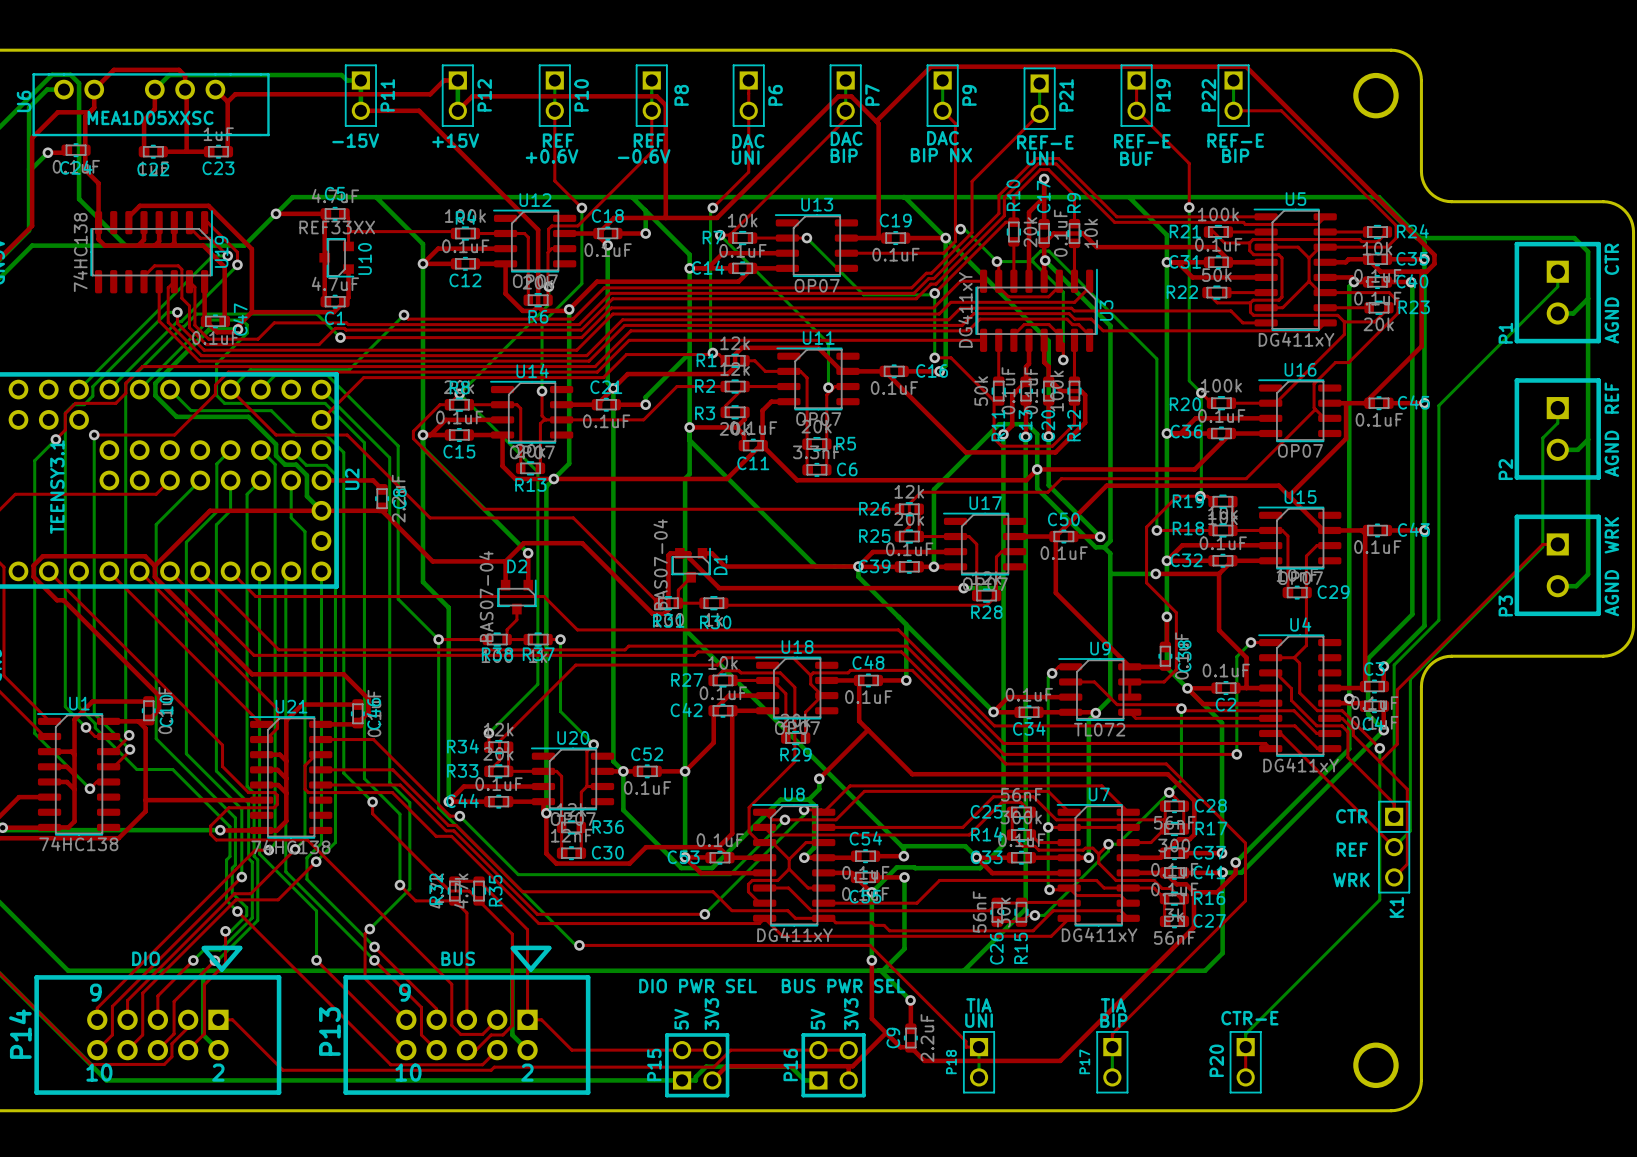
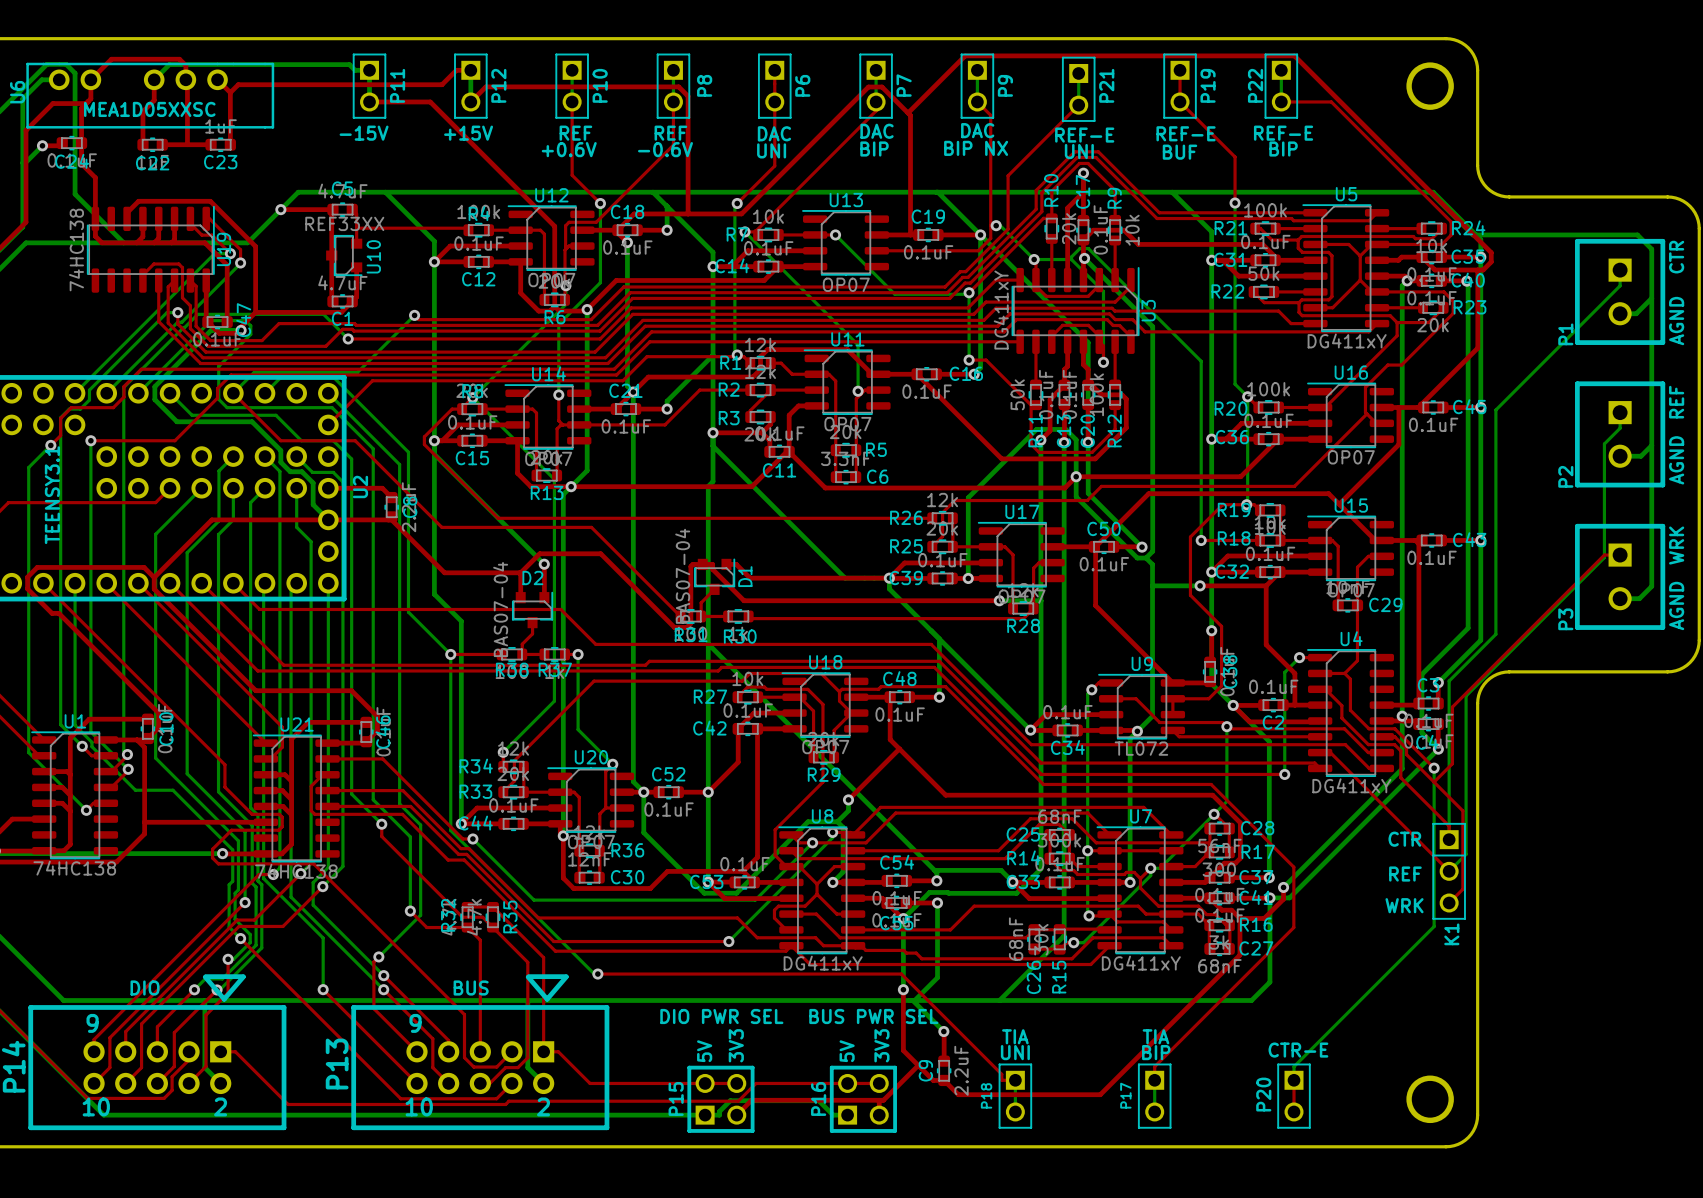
C25 value: 56nF (1021, 794) -> 68nF (1060, 816)
C26 value: 56nF (979, 911) -> 68nF (1016, 939)
C27 value: 56nF (1174, 937) -> 68nF (1219, 966)

